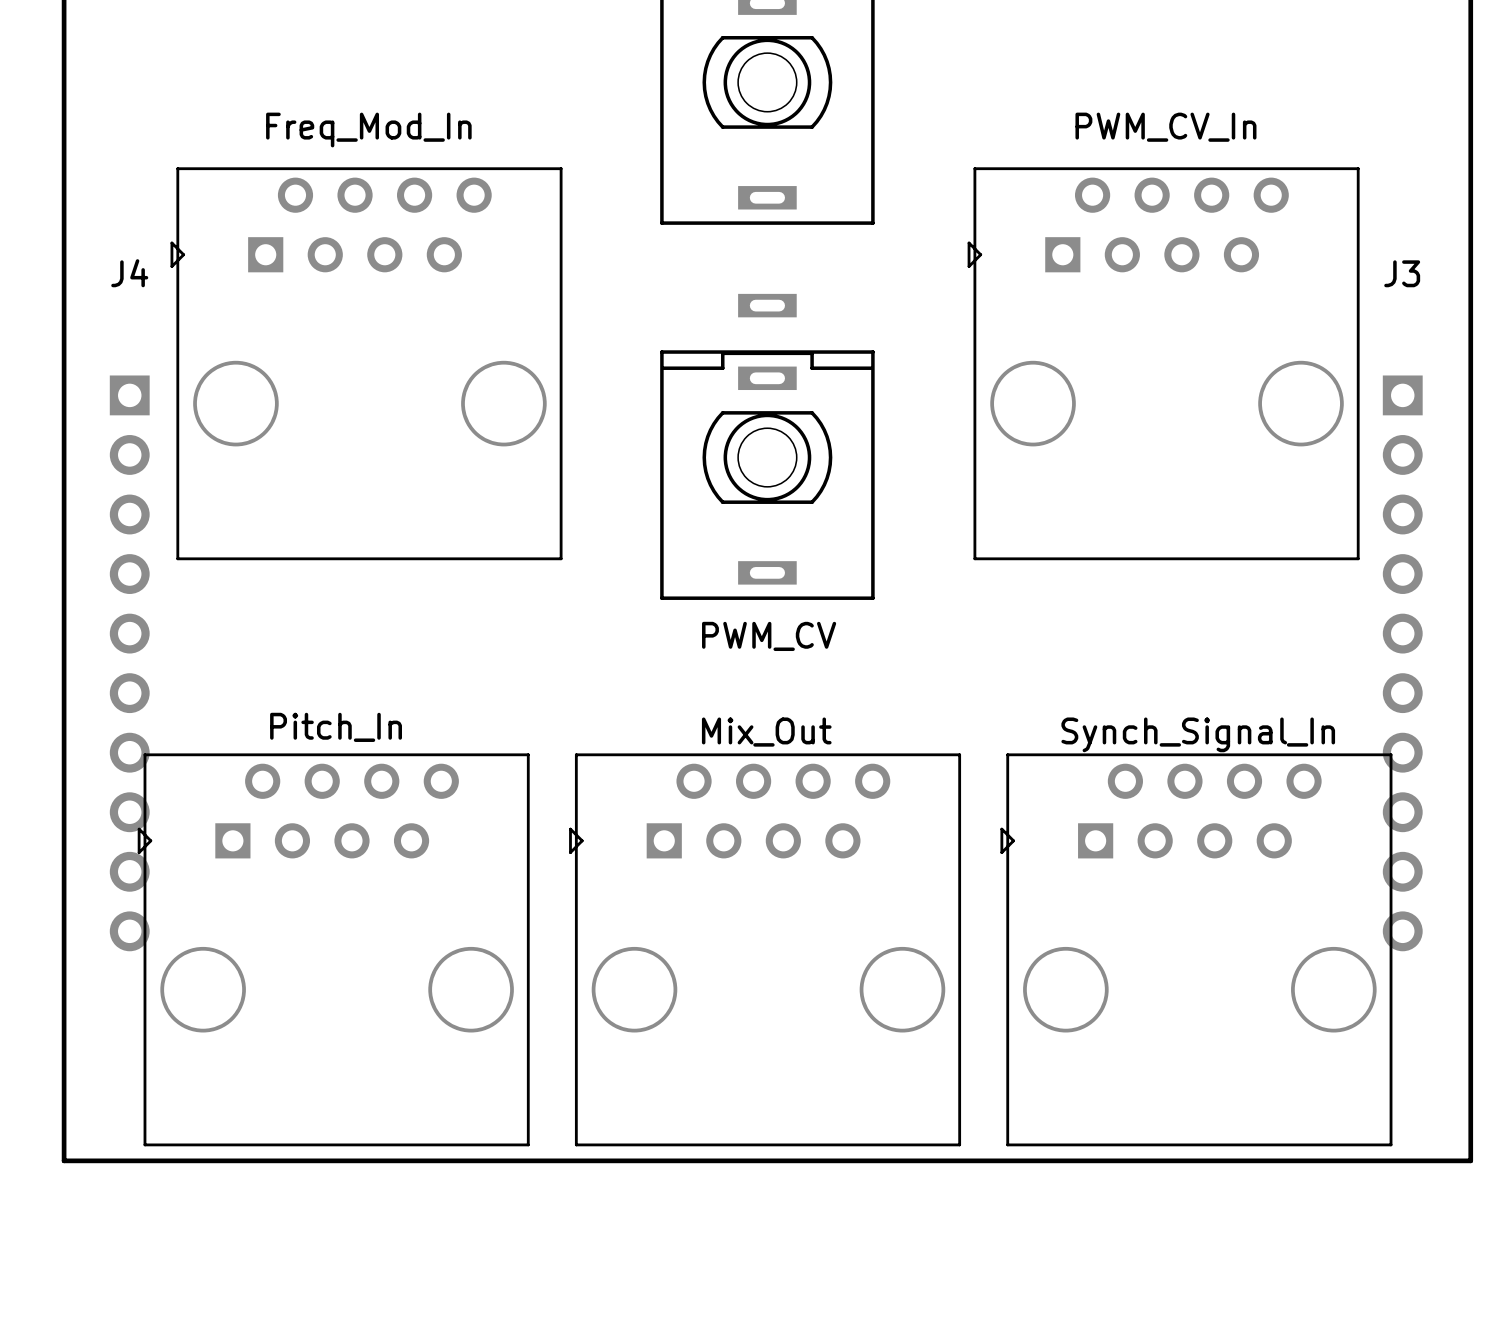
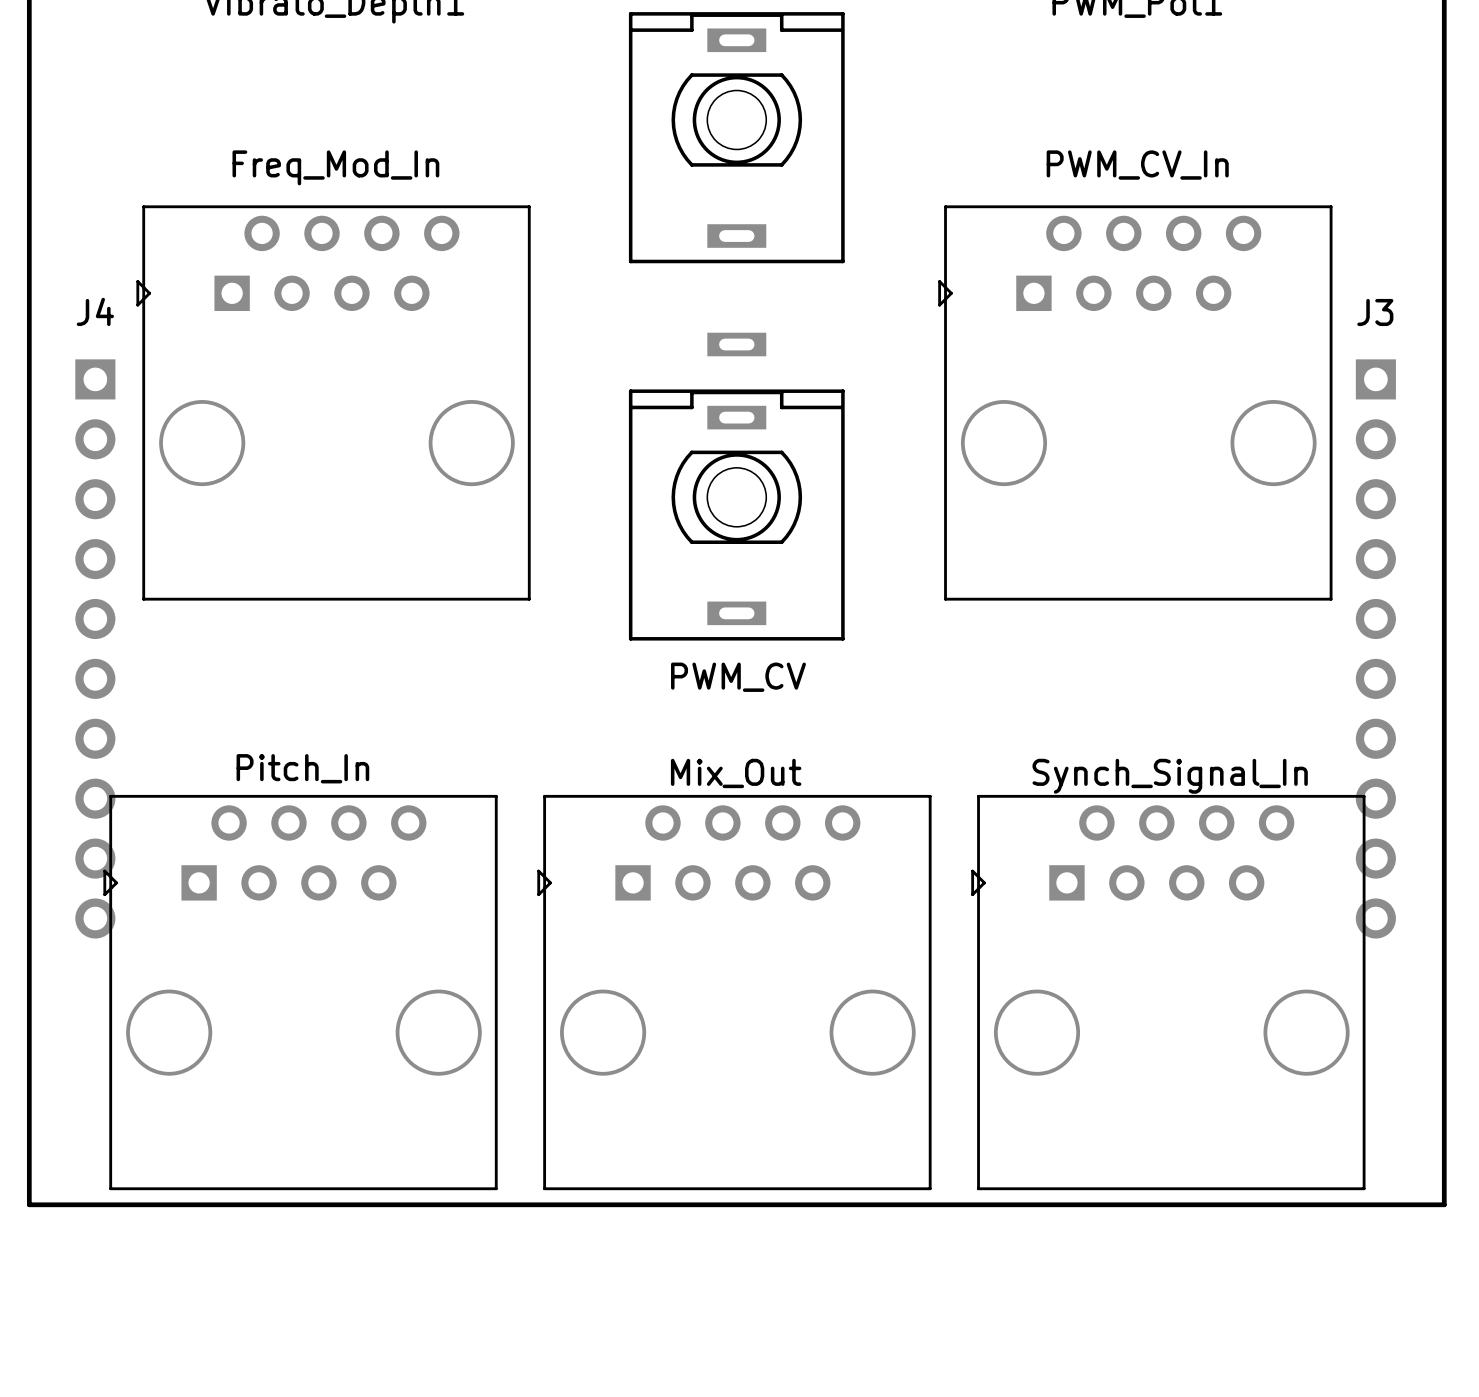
part position: (129, 663) -> (95, 648)
part position: (1402, 663) -> (1375, 648)

